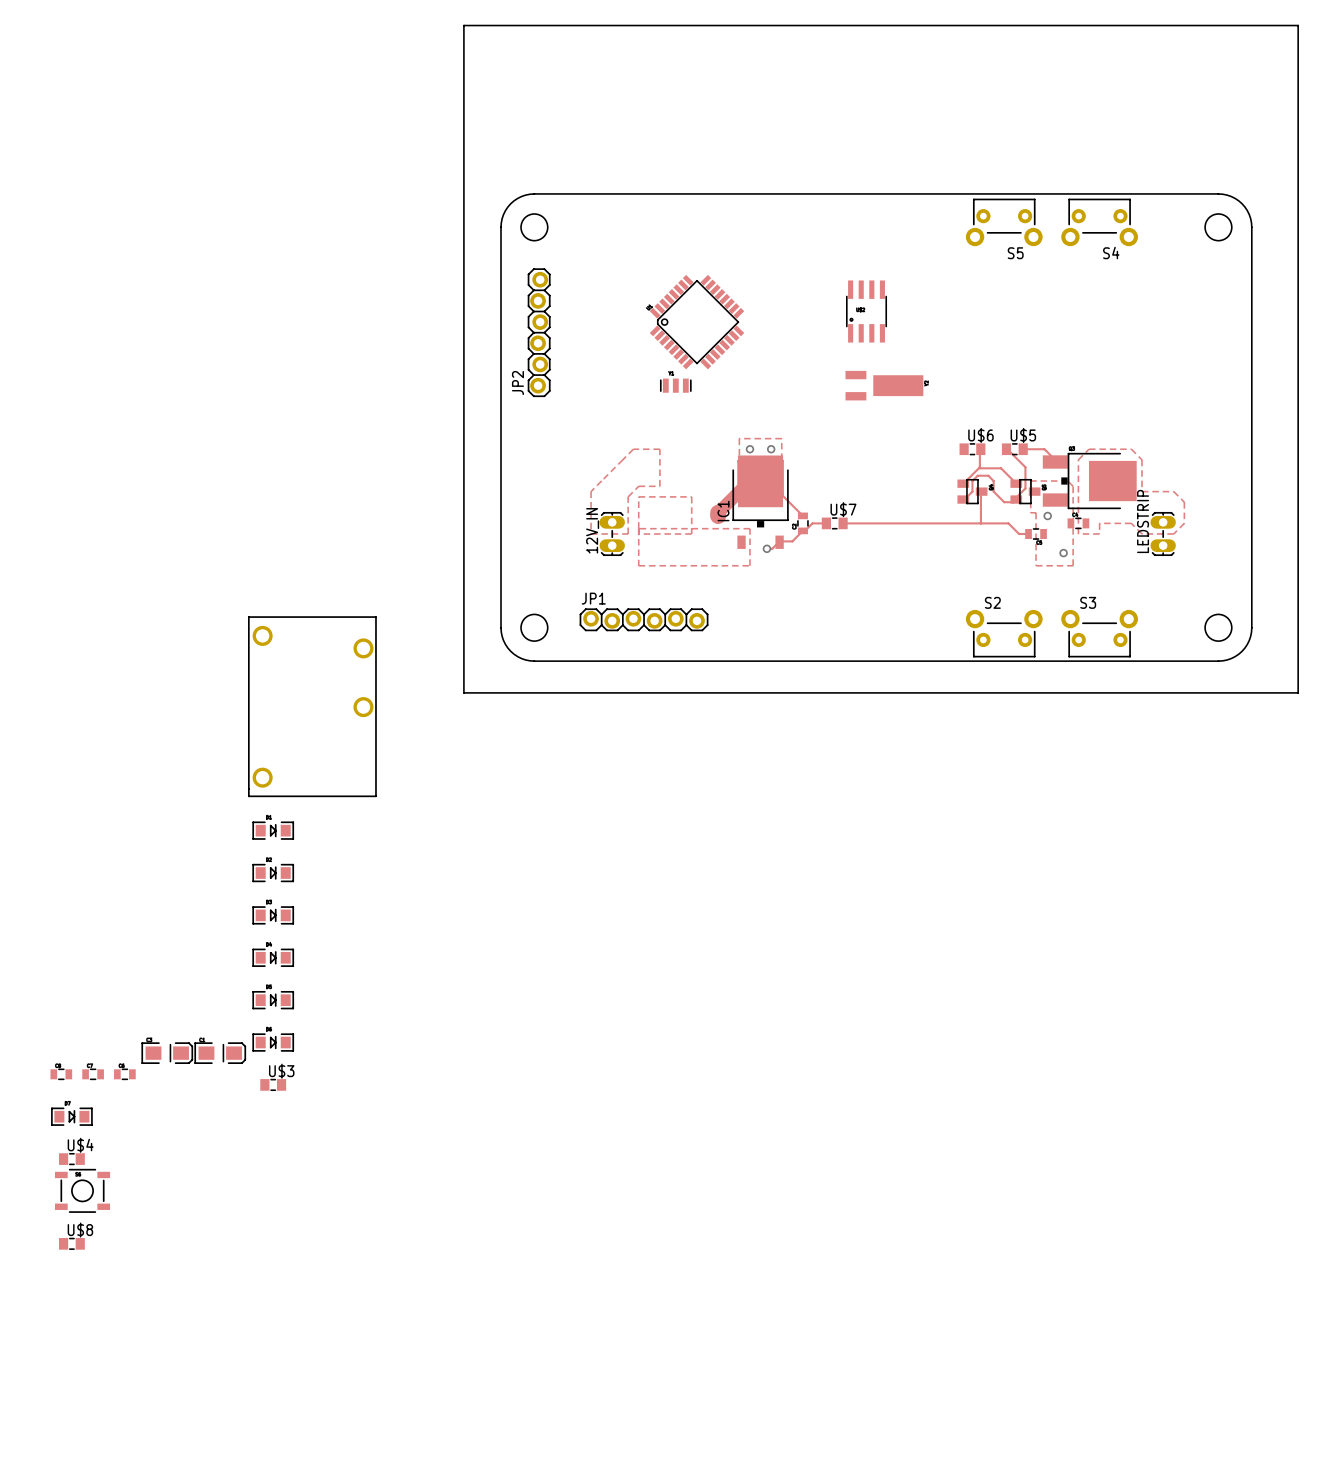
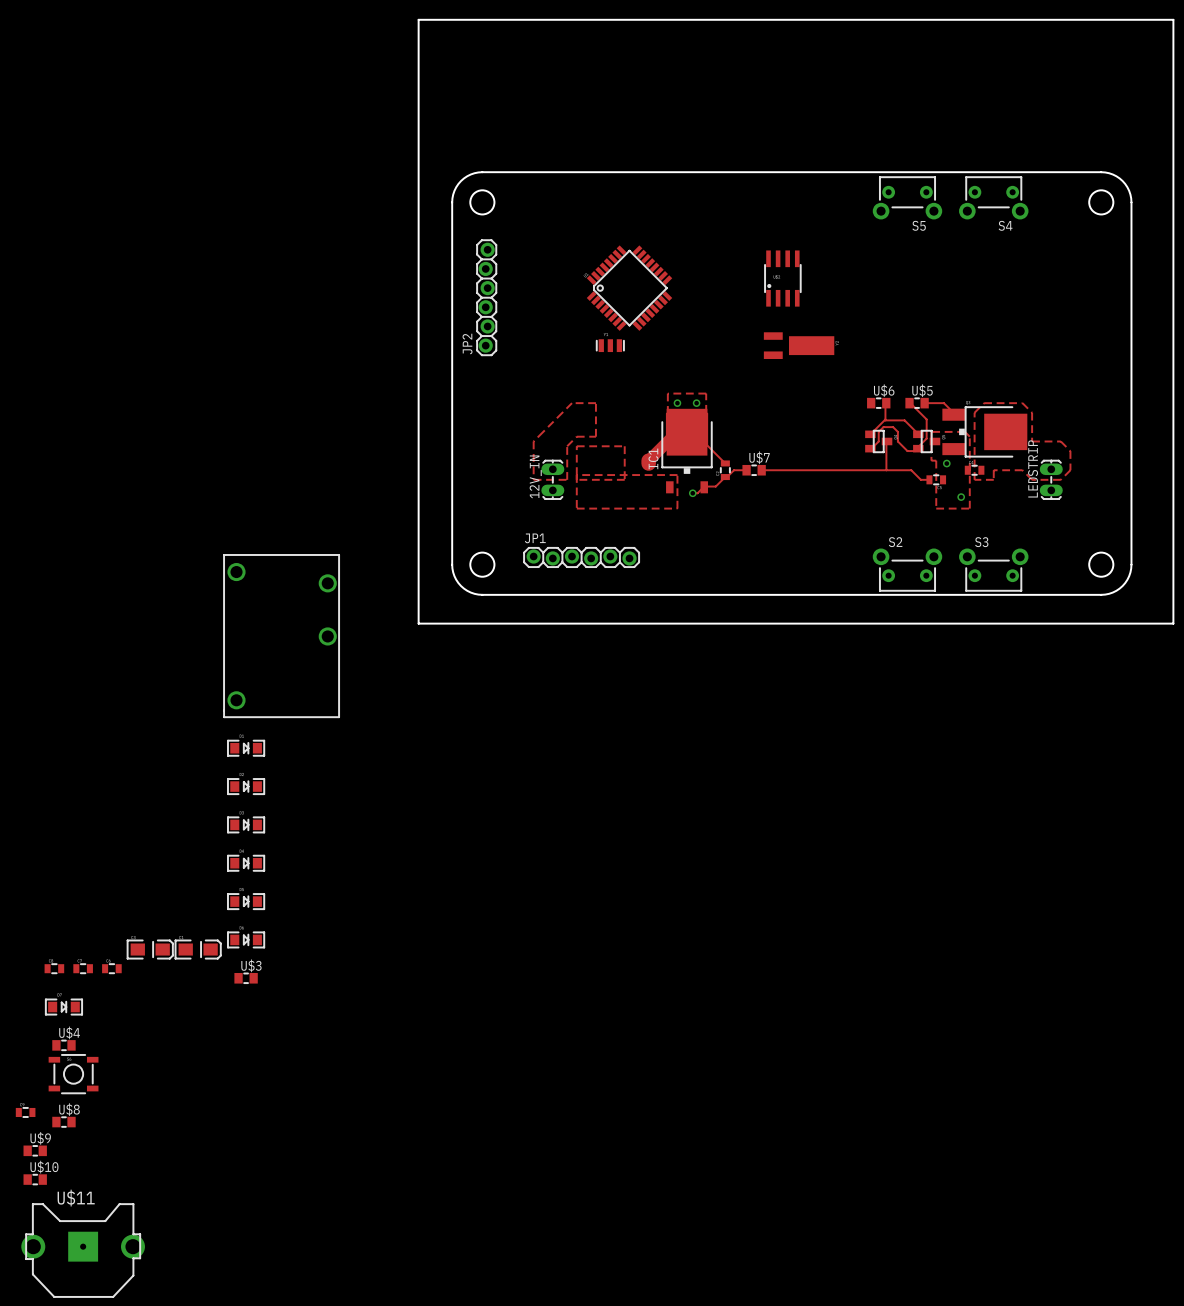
part: none -> (25, 1112)
U$9: none -> (35, 1150)
U$10: none -> (35, 1179)
U$11: none -> (83, 1250)

